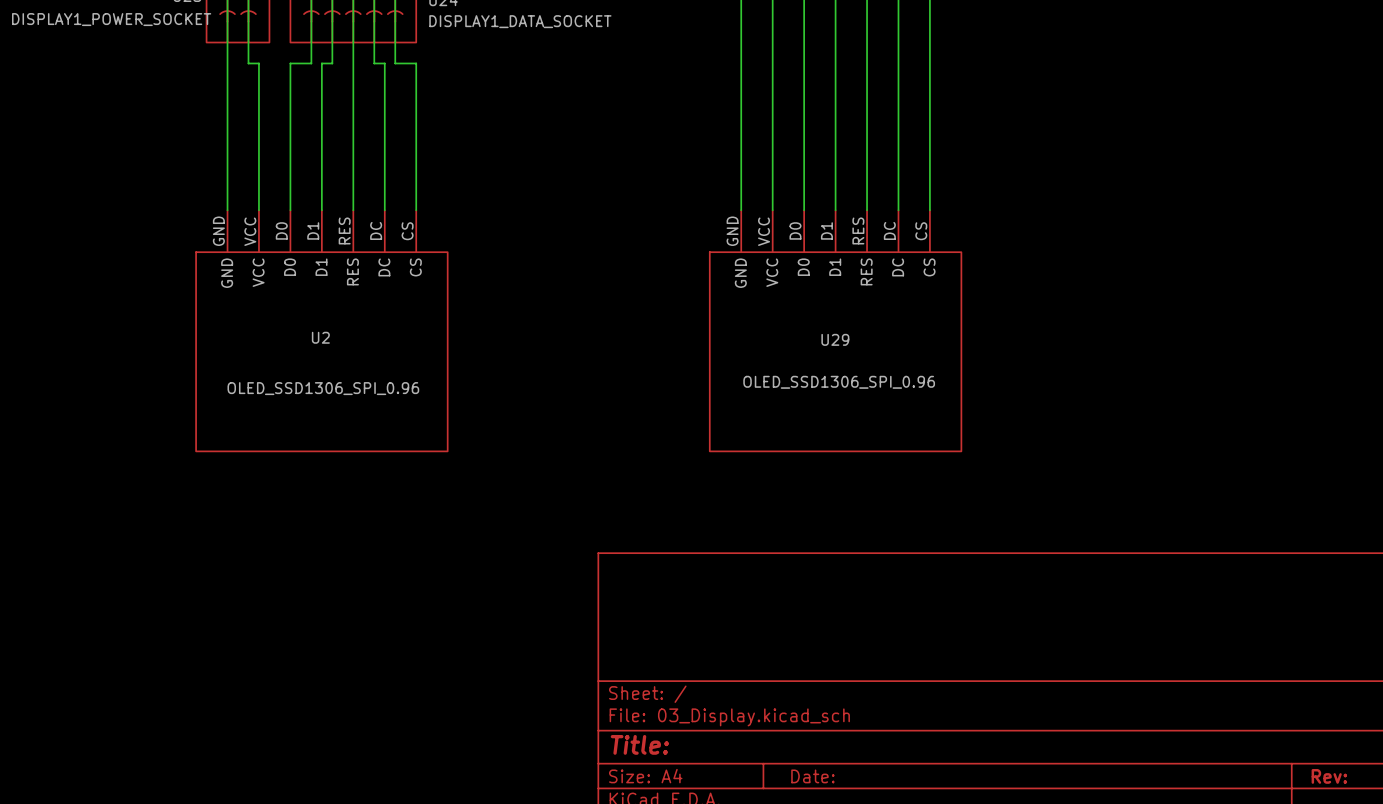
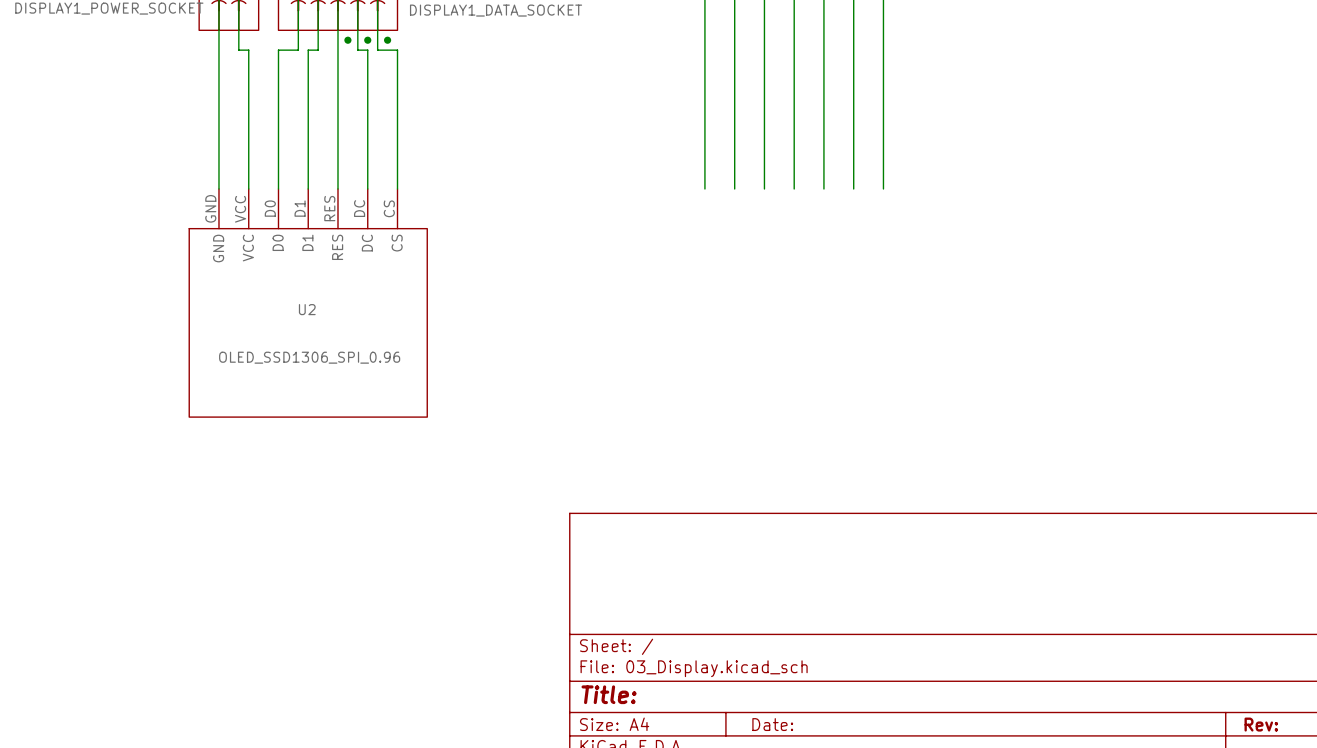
junction: none -> (347, 40)
junction: none -> (367, 40)
junction: none -> (387, 40)
U29: OLED_SSD1306_SPI_0.96 (835, 330) -> none

